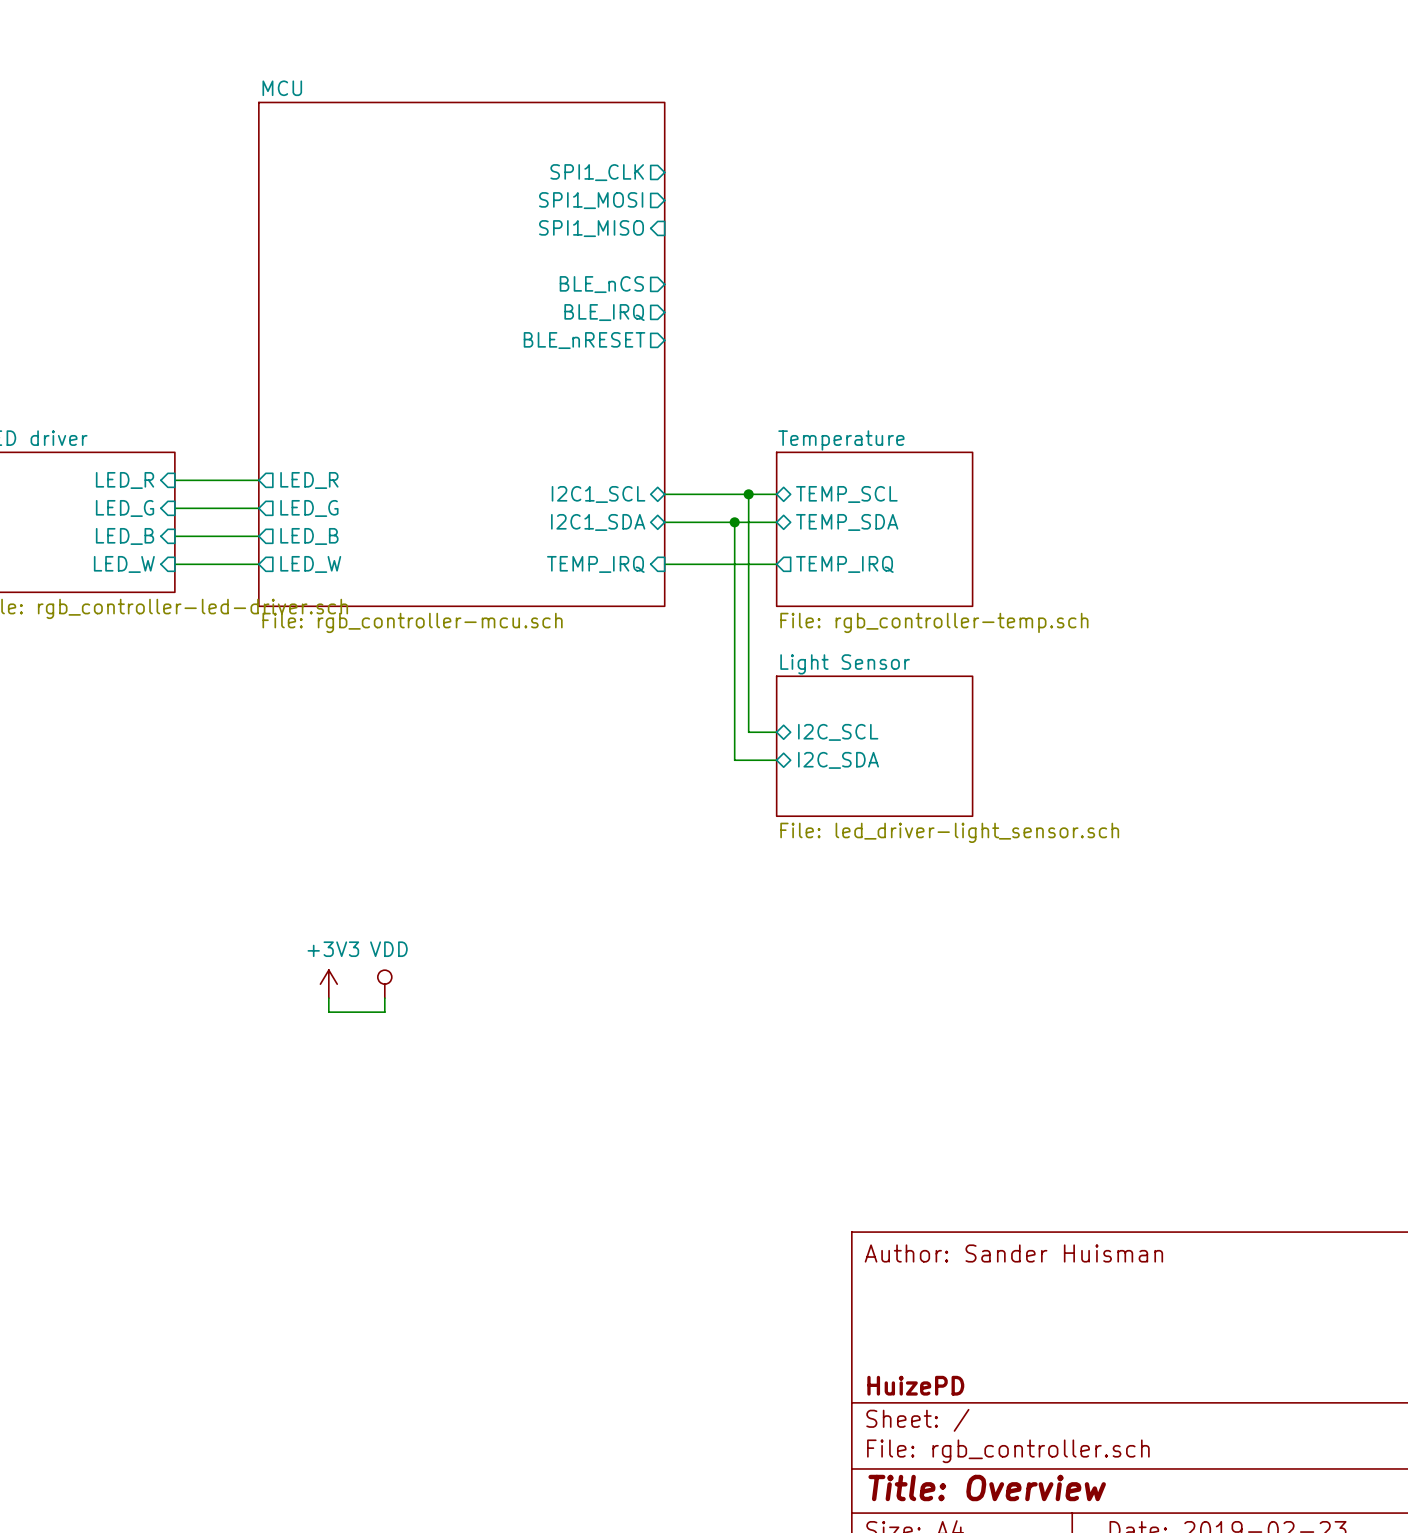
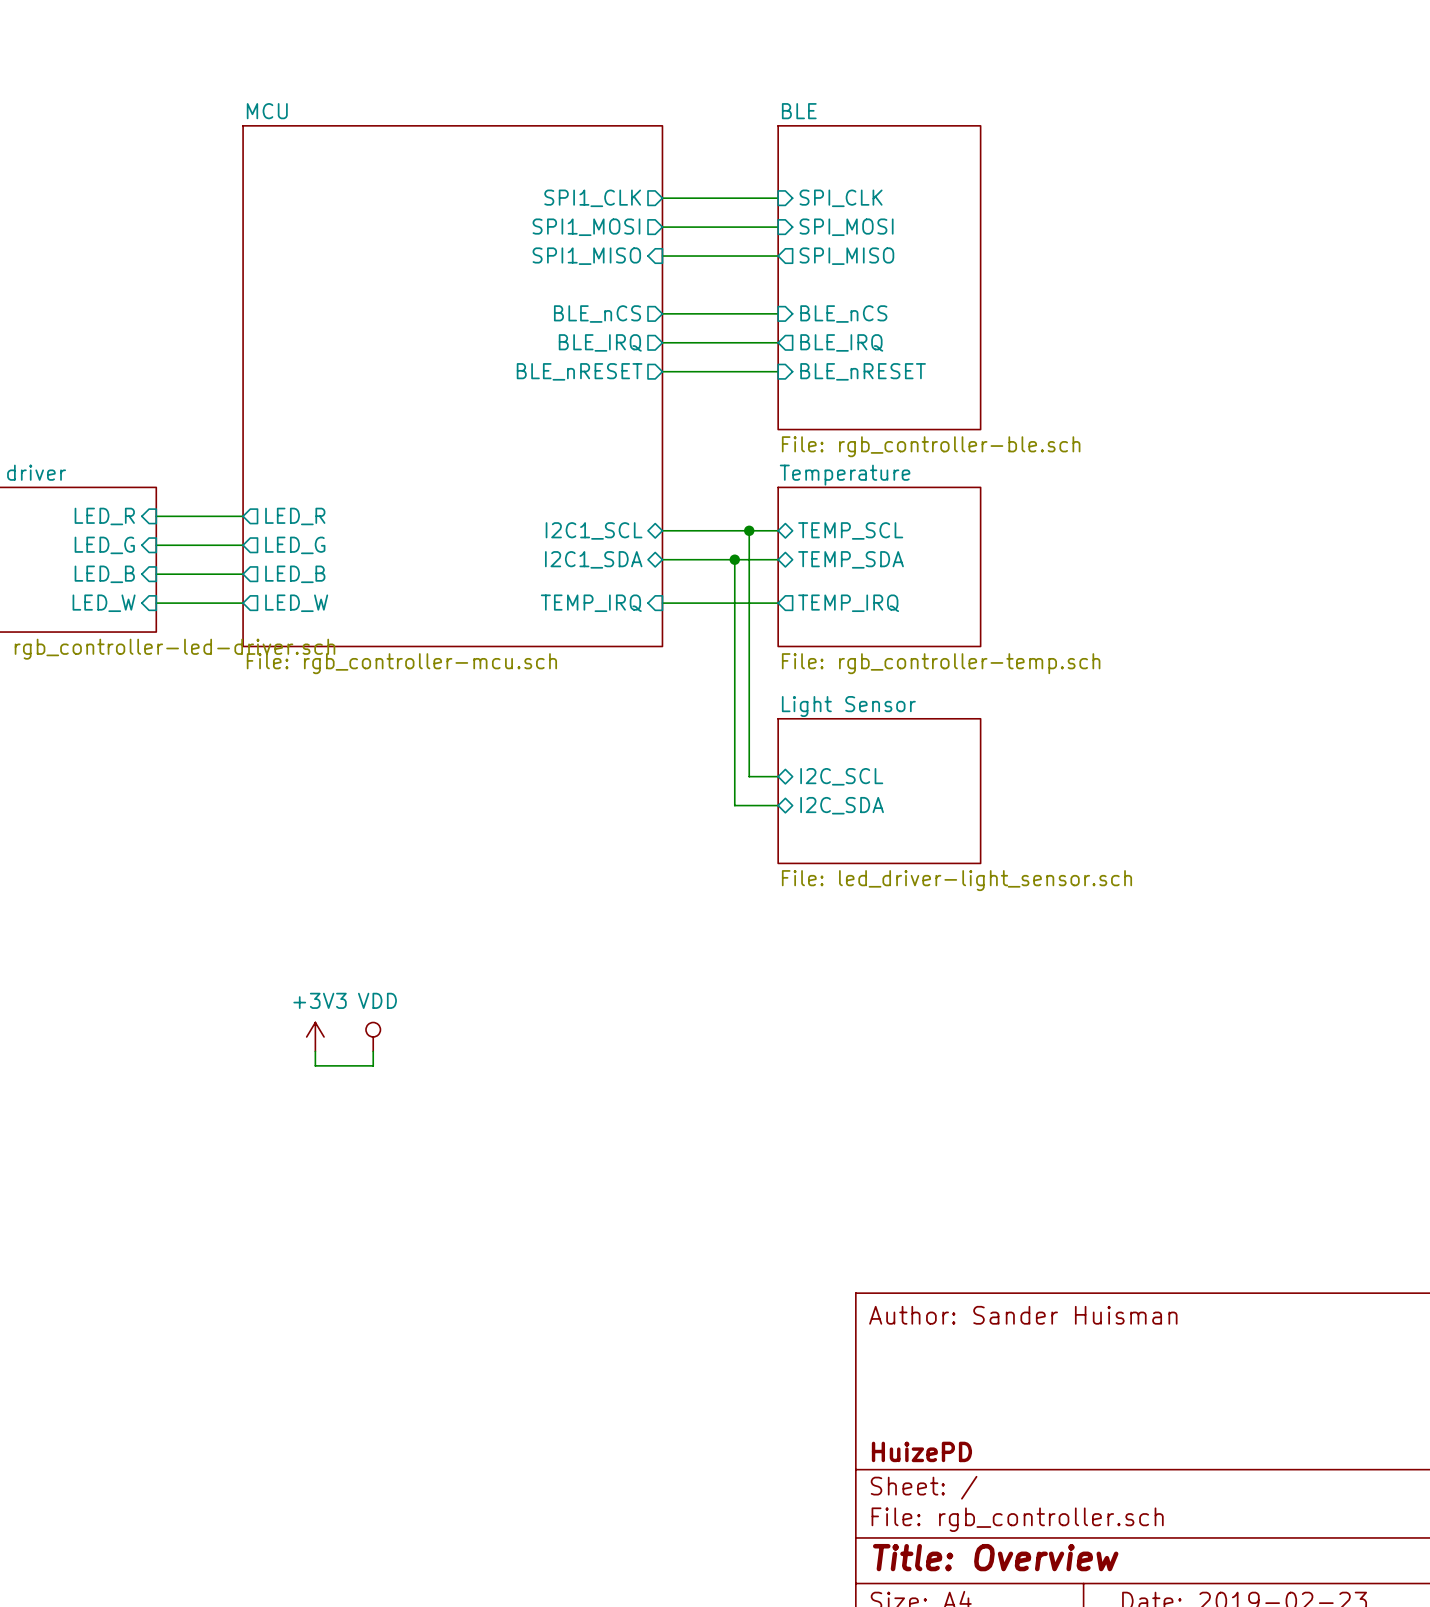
wire: none -> (662, 198) (778, 198)
sheet pin: none -> SPI_CLK (841, 198)
wire: none -> (662, 227) (778, 227)
sheet pin: none -> SPI_MOSI (846, 227)
wire: none -> (662, 256) (778, 256)
sheet pin: none -> SPI_MISO (846, 256)
sheet BLE: none -> File: rgb_controller-ble.sch (879, 277)
wire: none -> (662, 313) (778, 313)
sheet pin: none -> BLE_nCS (843, 314)
wire: none -> (662, 342) (778, 342)
sheet pin: none -> BLE_IRQ (841, 342)
wire: none -> (662, 371) (778, 371)
sheet pin: none -> BLE_nRESET (863, 371)

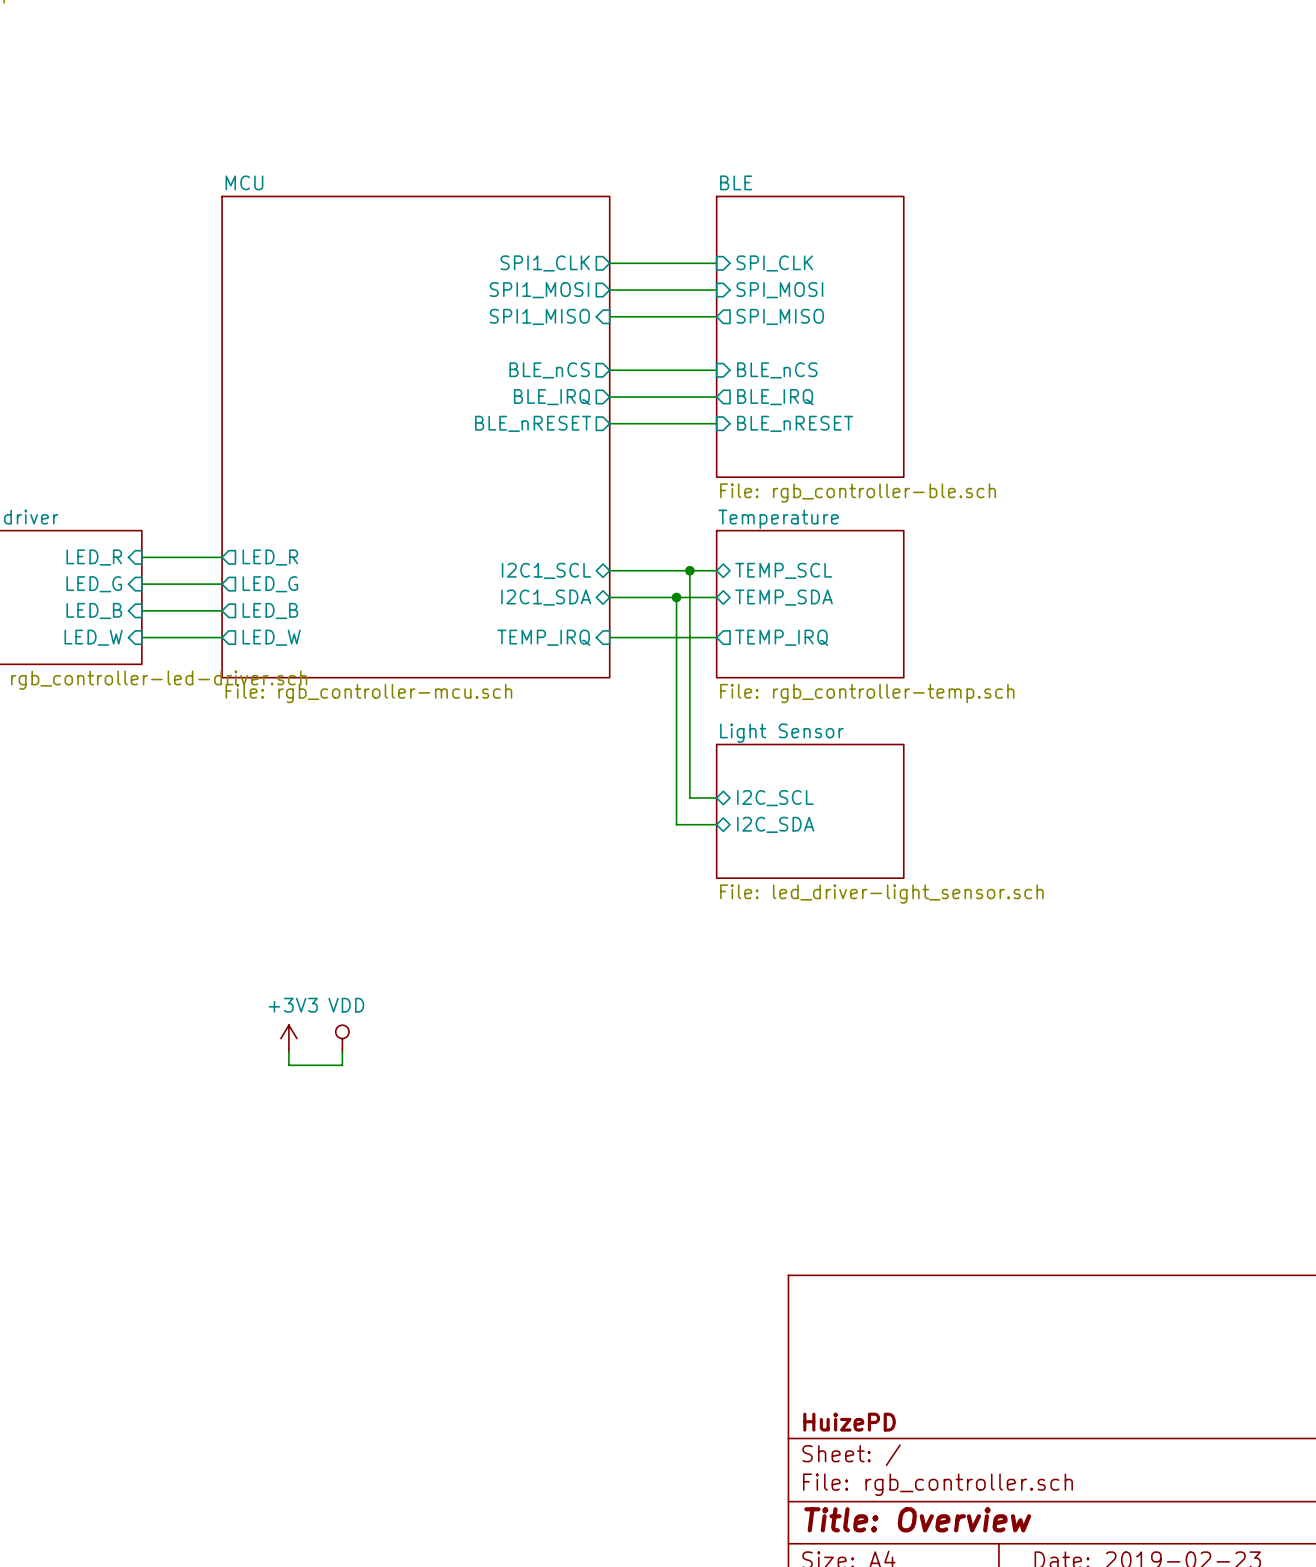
title block: Author: Sander Huisman (1023, 1315) -> none

